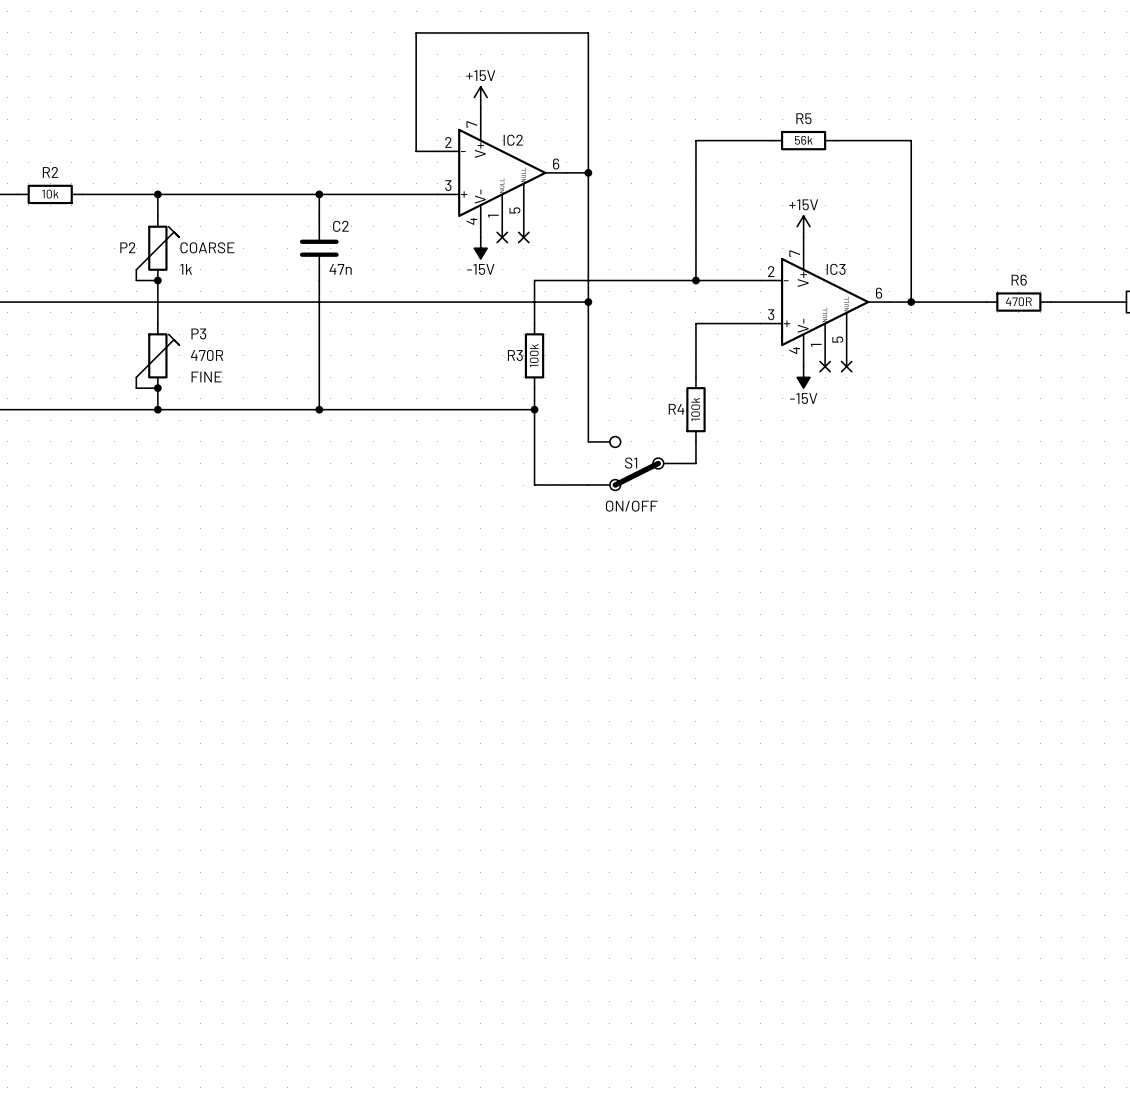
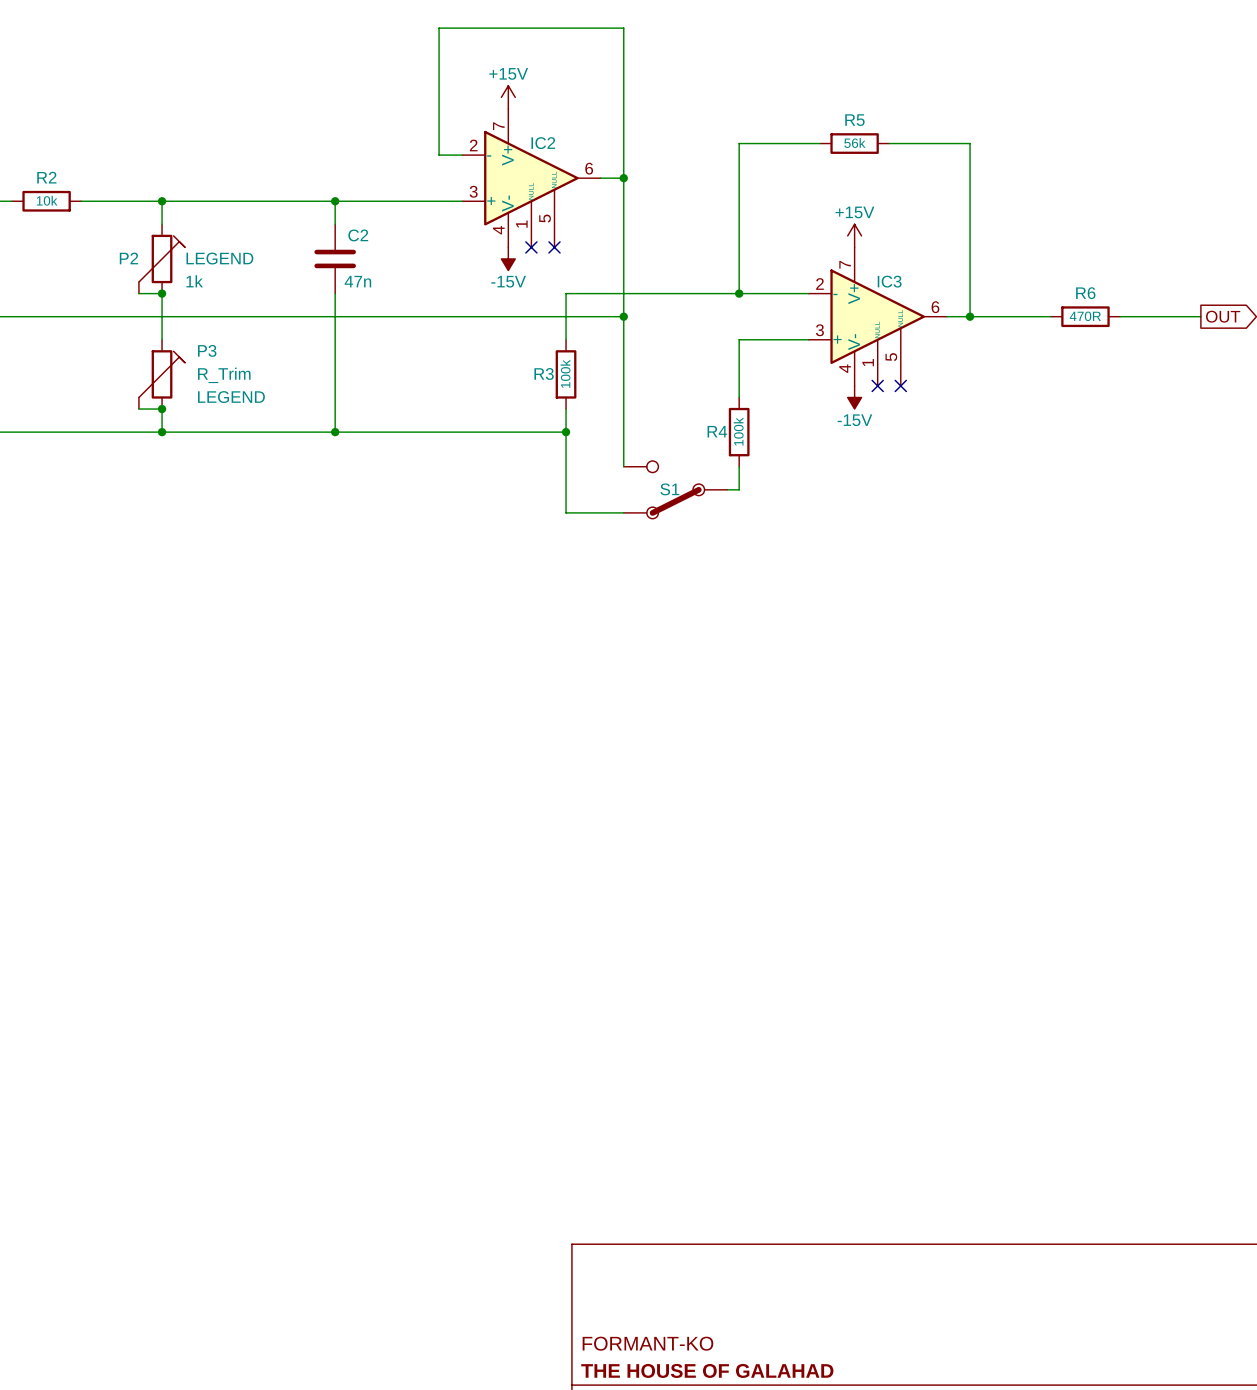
P2 text: COARSE (207, 247) -> LEGEND (219, 258)
P3 value: 470R (207, 355) -> R_Trim (224, 375)
P3 text: FINE (206, 376) -> LEGEND (231, 397)
S1 text: ON/OFF (631, 506) -> none

